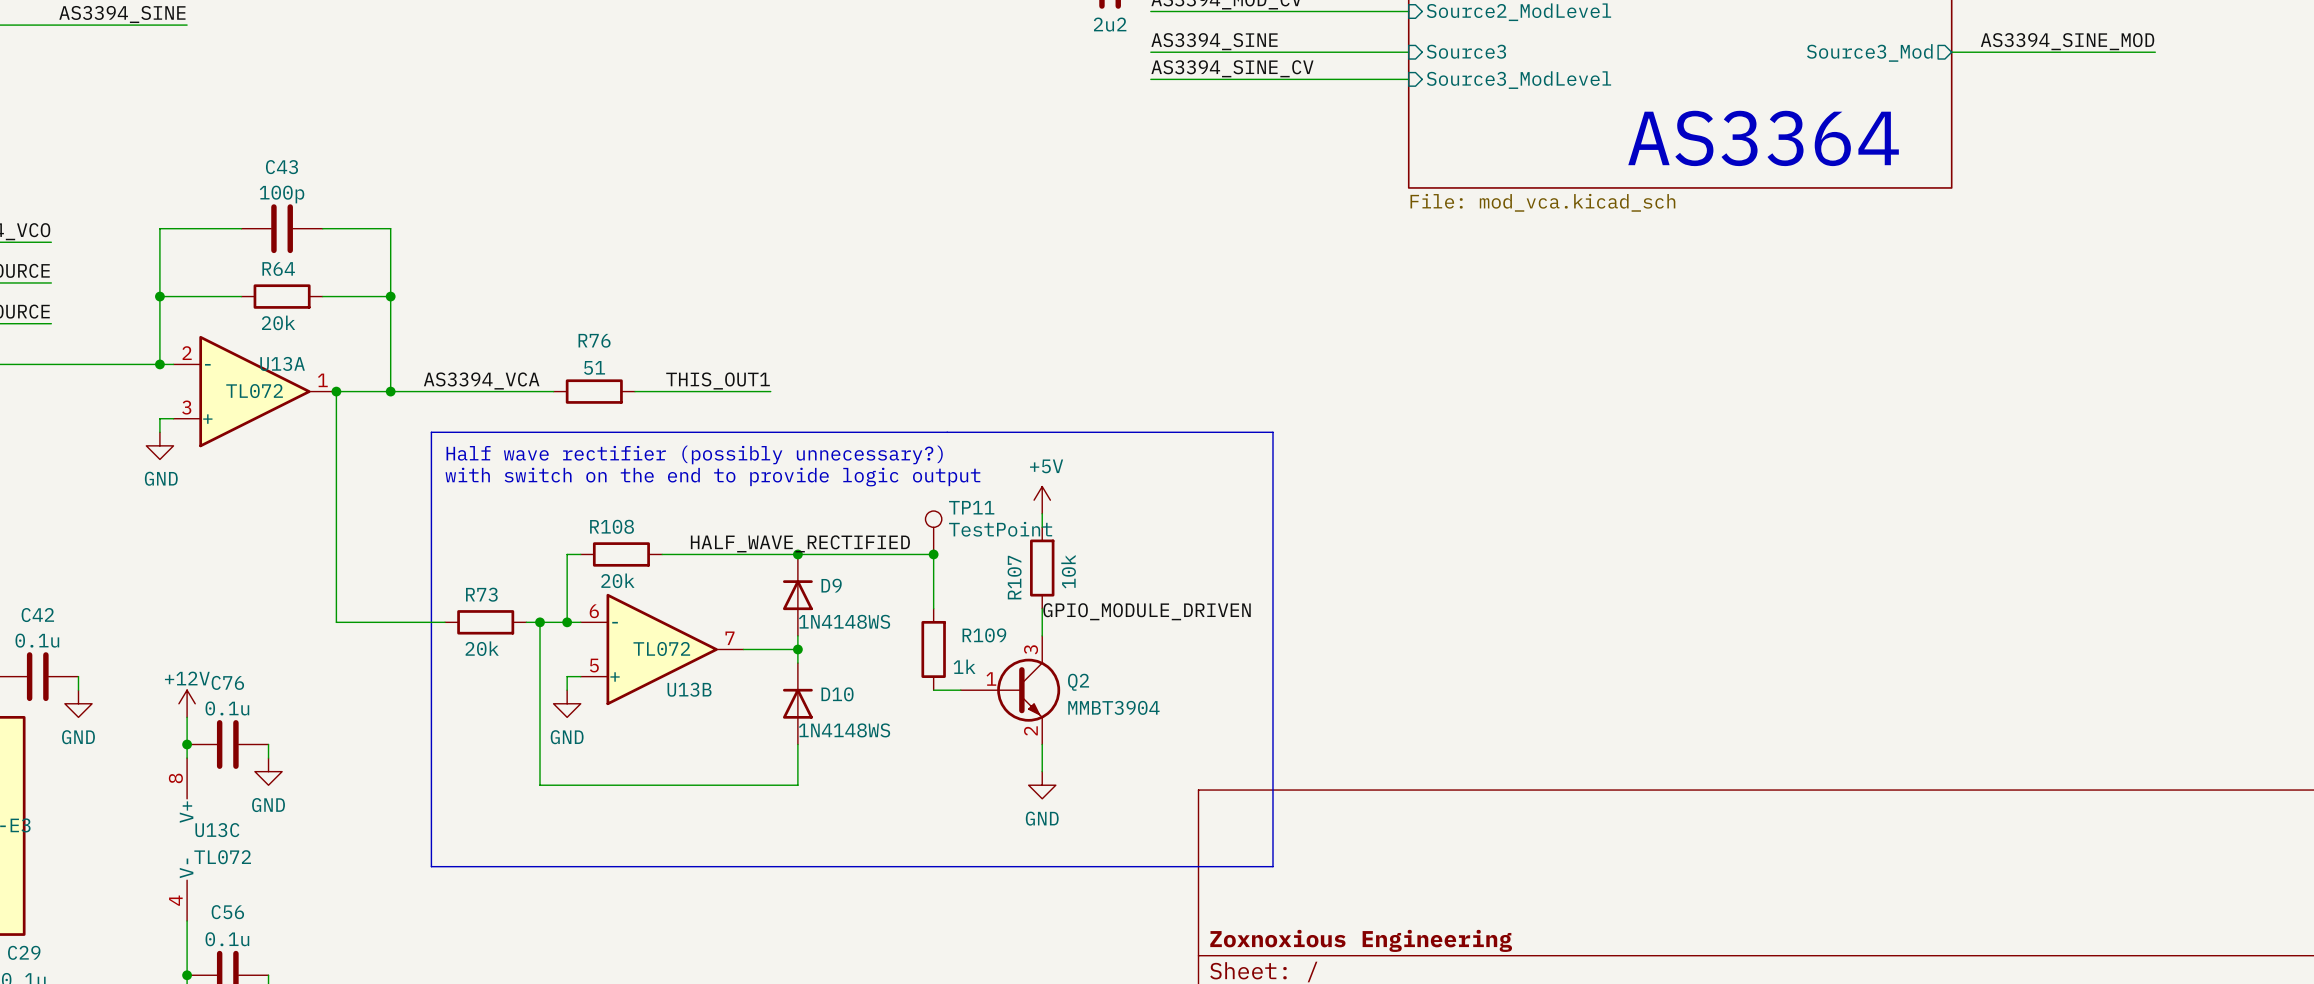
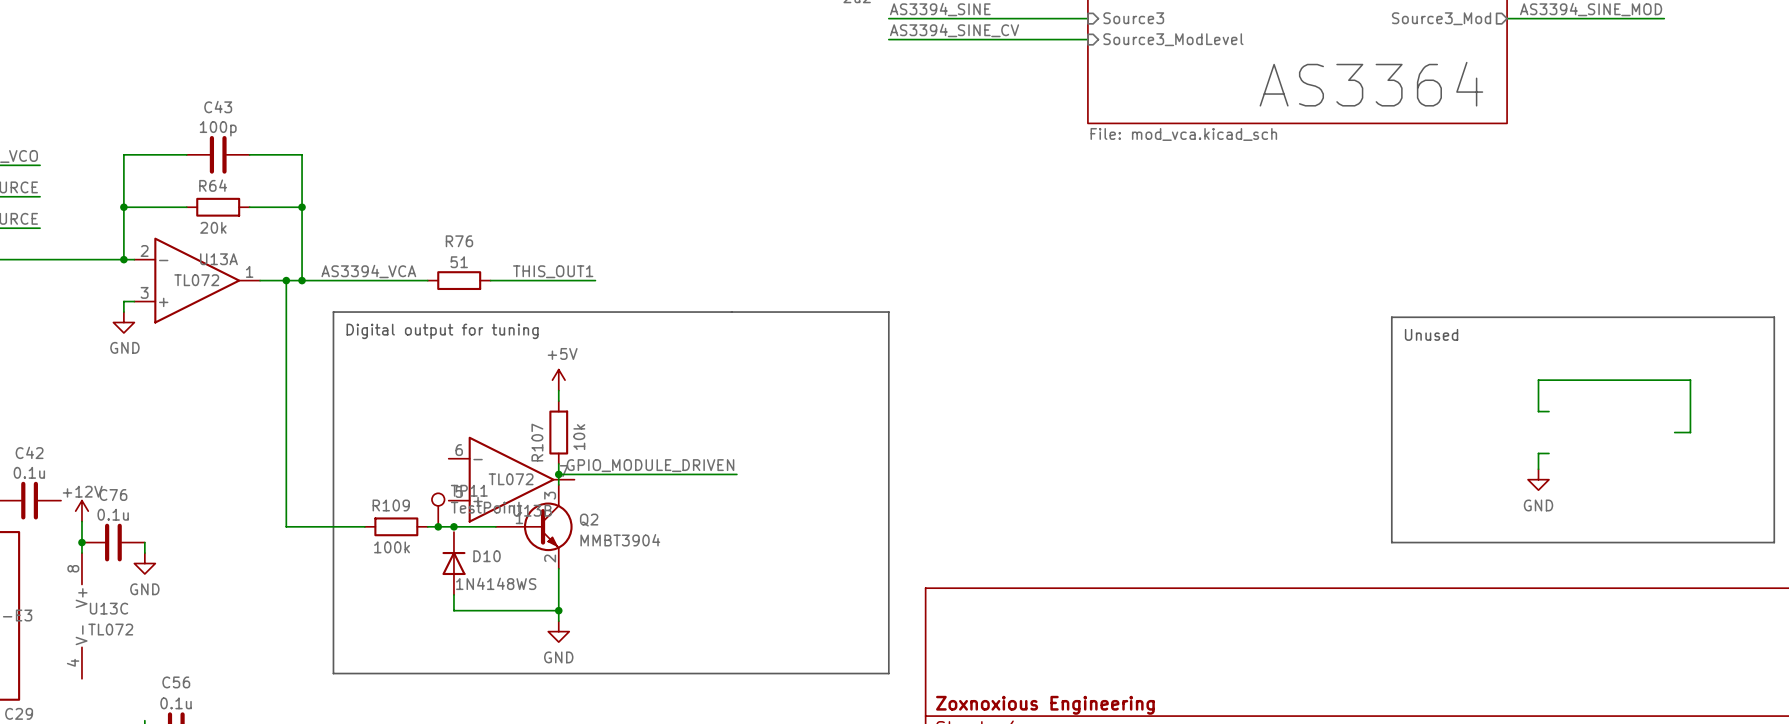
wire: (336, 391) (336, 622) (444, 622) -> none
junction position: (336, 391) -> (286, 280)
wire: none -> (286, 280) (286, 526) (364, 526)
line: (1150, 432) (1272, 432) (1272, 866) (431, 866) -> (888, 312) (888, 673) (333, 673) (333, 647)
line: none -> (1391, 317) (1774, 317) (1774, 542) (1391, 542) (1391, 317)
text: Half wave rectifier (possibly unnecessary?) (694, 454) -> Digital output for tuning (442, 331)
text: none -> Unused (1431, 334)
text: with switch on the end to provide logic output (712, 477) -> none
power symbol: +5V (1042, 500) -> none
wire: (1042, 513) (1042, 527) -> none
power symbol: none -> +5V (558, 380)
TP11 position: (933, 532) -> (438, 510)
wire: none -> (558, 390) (558, 401)
label: HALF_WAVE_RECTIFIED (800, 543) -> none
wire: (580, 554) (567, 554) (567, 622) -> none
R108: 20k (621, 554) -> none
wire: (662, 554) (933, 554) (933, 608) -> none
junction: (797, 554) -> none
junction: (933, 554) -> none
wire: none -> (1548, 411) (1538, 411) (1538, 380) (1690, 380) (1690, 432) (1674, 432)
R107 position: (1042, 568) -> (558, 432)
D9: 1N4148WS (797, 595) -> none
wire: (1042, 608) (1042, 635) -> none
label position: GPIO_MODULE_DRIVEN (1147, 611) -> GPIO_MODULE_DRIVEN (650, 465)
wire: none -> (1548, 453) (1538, 453) (1538, 469)
R73: 20k (485, 622) -> none
wire: (526, 622) (580, 622) -> none
wire: (540, 622) (540, 785) (797, 785) (797, 744) -> none
junction: (540, 622) -> none
junction: (567, 622) -> none
wire: (797, 635) (797, 663) -> (558, 463) (558, 484)
R109 name position: R109 (984, 635) -> R109 (391, 505)
wire: none -> (558, 474) (736, 474)
junction: none -> (558, 474)
wire: (743, 649) (797, 649) -> none
junction: (797, 649) -> none
R109 rotation: 0° (933, 649) -> 90° clockwise (396, 526)
R109 position: (933, 649) -> (396, 526)
power symbol: none -> GND (1538, 479)
R109 value: 1k (964, 666) -> 100k (392, 547)
wire: (78, 676) (78, 690) -> none
wire: (580, 676) (567, 676) (567, 690) -> none
power symbol: none -> +12V (81, 511)
wire: (933, 690) (960, 690) -> none
Q2 position: (1010, 690) -> (534, 526)
power symbol: GND (78, 703) -> none
power symbol: +12V (187, 703) -> none
power symbol: GND (567, 703) -> none
D10 position: (797, 703) -> (453, 563)
wire: none -> (427, 526) (495, 526)
junction: none -> (438, 526)
junction: none -> (453, 526)
wire: (187, 717) (187, 730) -> none
junction: none -> (81, 542)
junction: (187, 744) -> none
C76 position: (227, 744) -> (113, 542)
wire: (268, 744) (268, 758) -> none
wire: (1042, 744) (1042, 771) -> none
power symbol: none -> GND (144, 563)
wire: none -> (558, 568) (558, 621)
power symbol: GND (268, 771) -> none
power symbol: GND (1042, 785) -> none
wire: none -> (453, 594) (453, 610) (558, 610)
junction: none -> (558, 610)
U13C position: (187, 839) -> (81, 615)
power symbol: none -> GND (558, 631)
wire: (187, 920) (187, 961) -> (81, 521) (81, 553)

